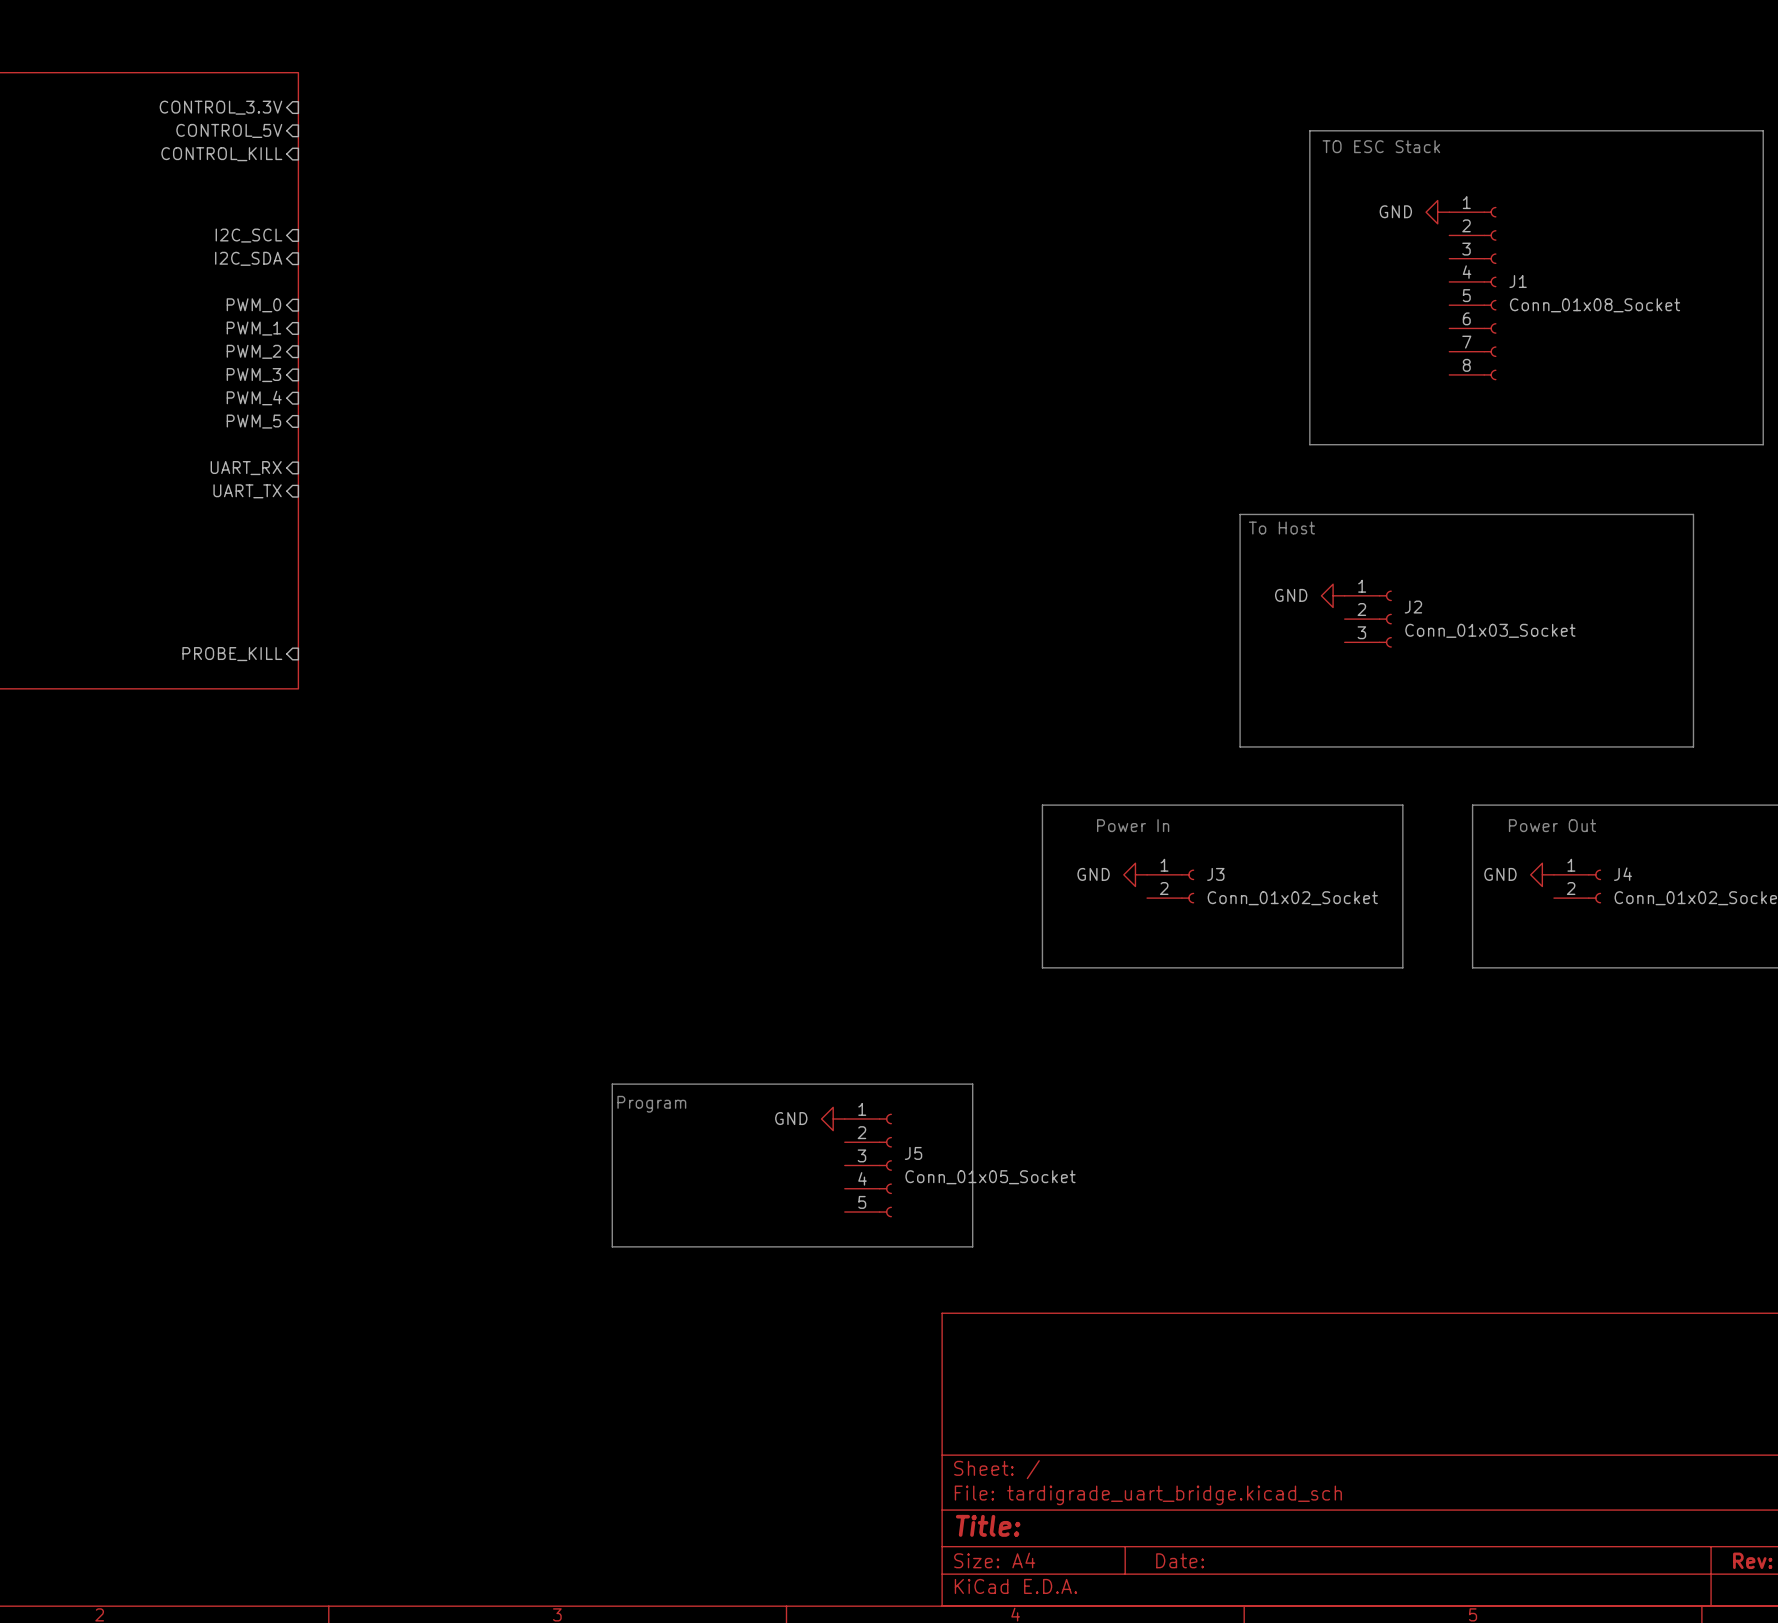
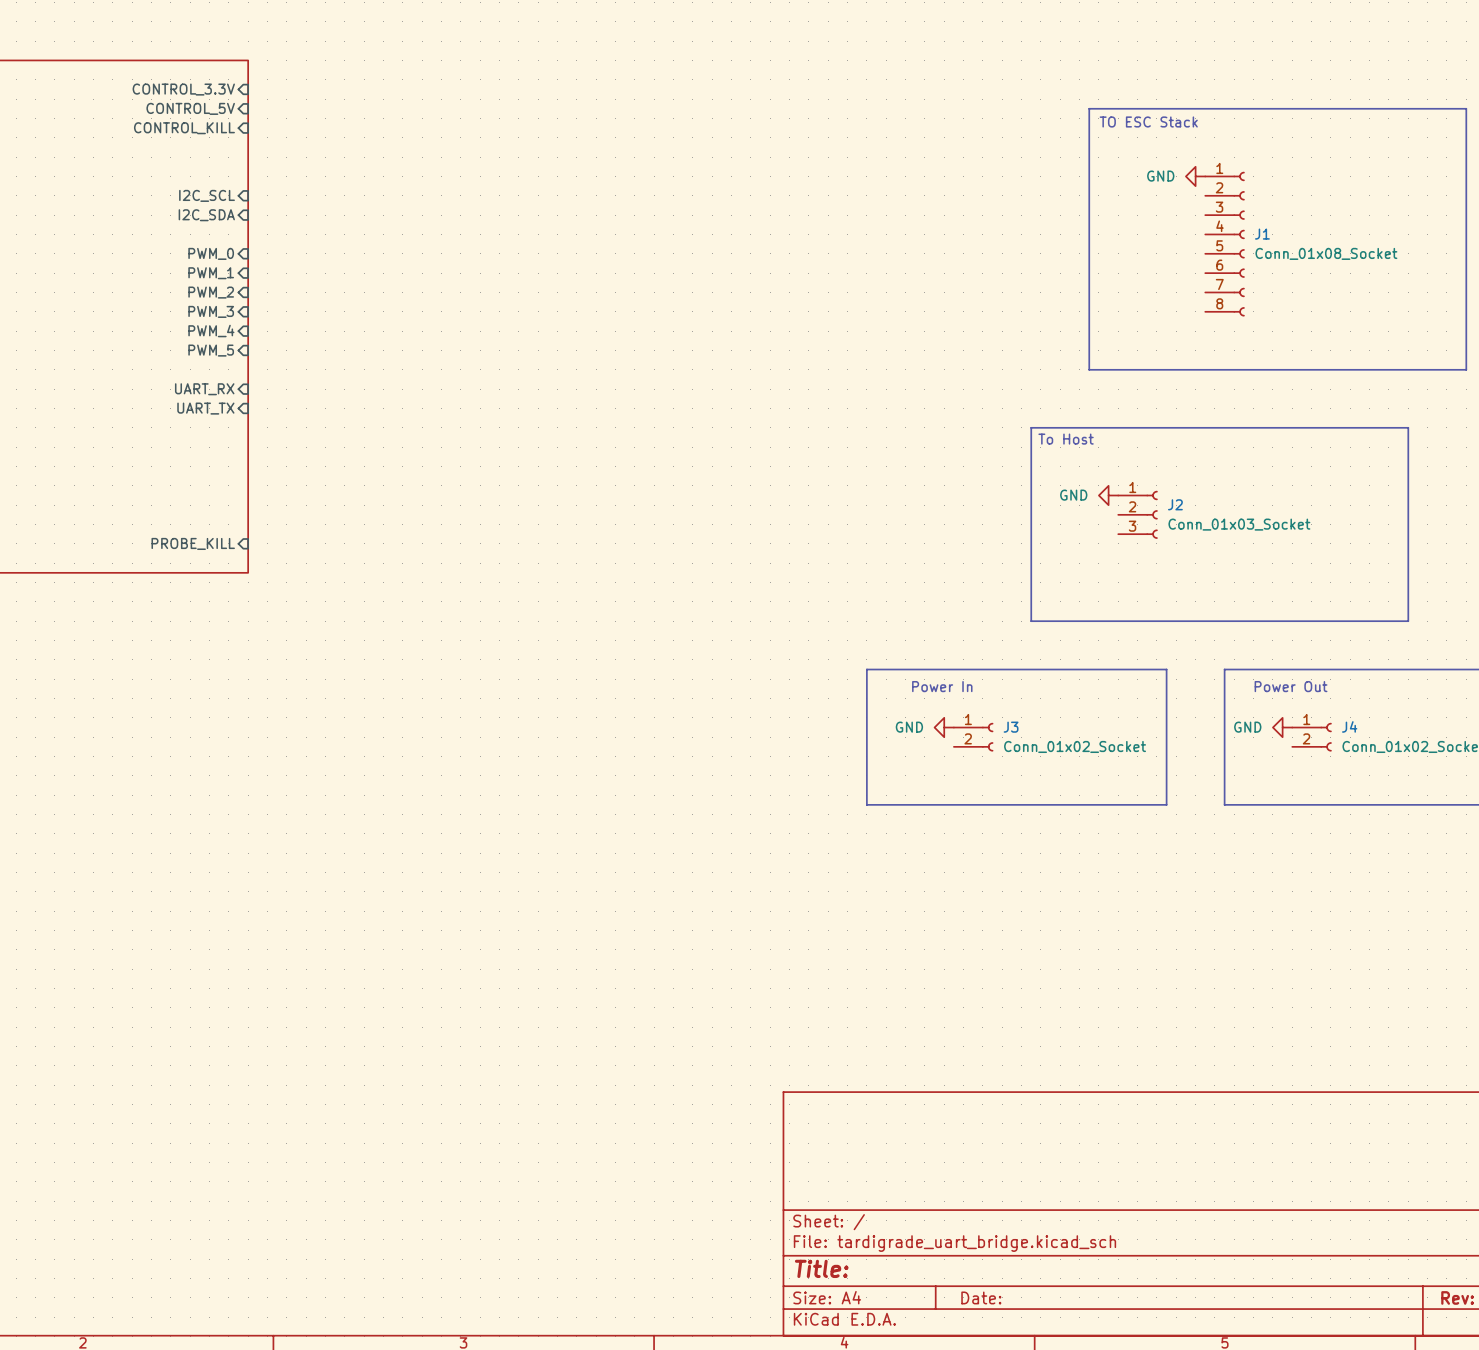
line: (612, 1084) (972, 1084) (972, 1246) (612, 1246) (612, 1084) -> none
text: Program (651, 1104) -> none
power symbol: GND (833, 1118) -> none
J5: Conn_01x05_Socket (868, 1165) -> none

